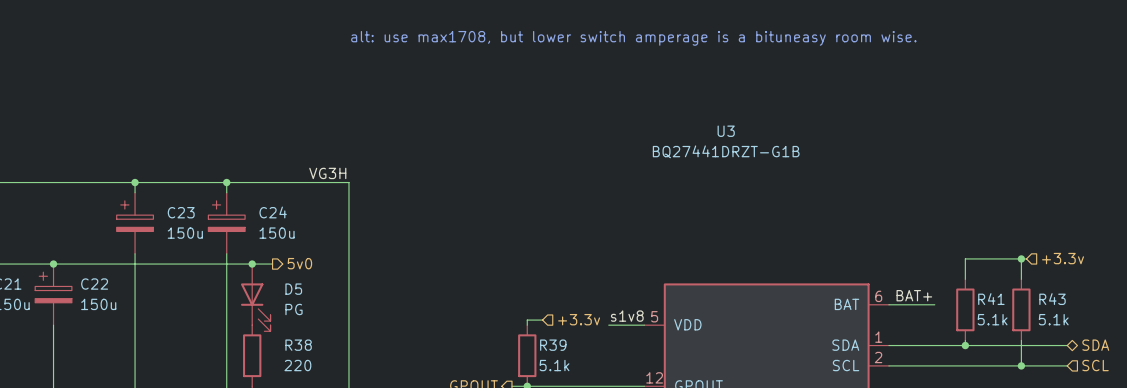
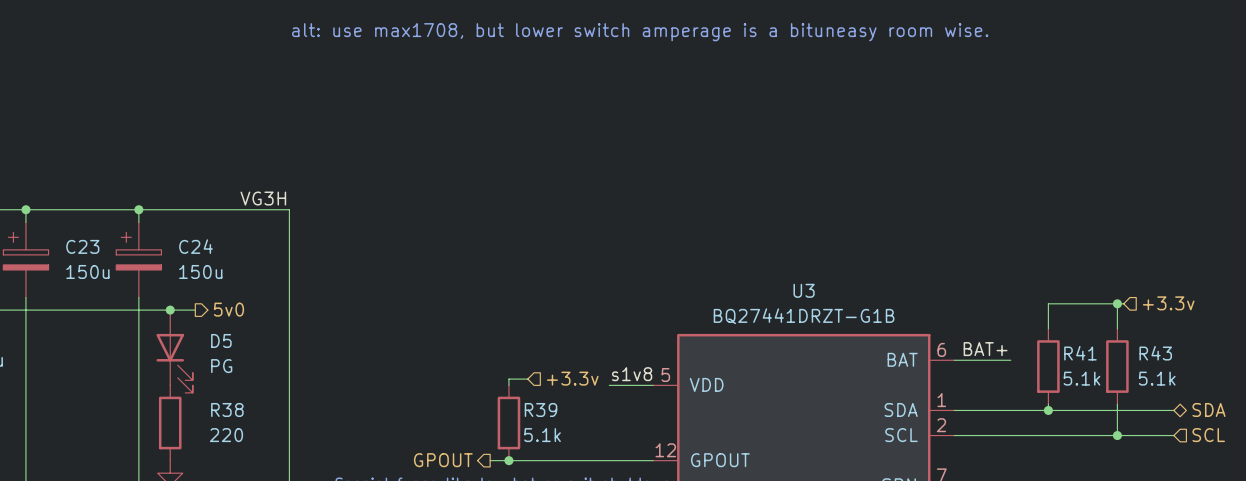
U3 name position: U3 (726, 131) -> U3 (804, 290)
U3 value position: BQ27441DRZT-G1B (726, 151) -> BQ27441DRZT-G1B (804, 316)

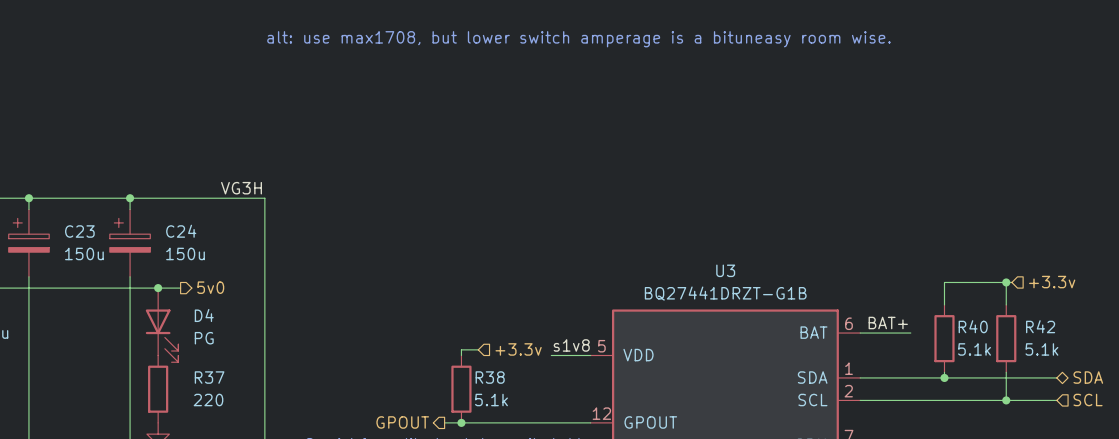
D5 name: D5 (221, 340) -> D4 (204, 315)
R41 name: R41 (1080, 353) -> R40 (973, 326)
R43 name: R43 (1155, 353) -> R42 (1040, 326)
R38 name: R38 (227, 409) -> R37 (209, 377)
R39 name: R39 (541, 409) -> R38 (490, 377)

